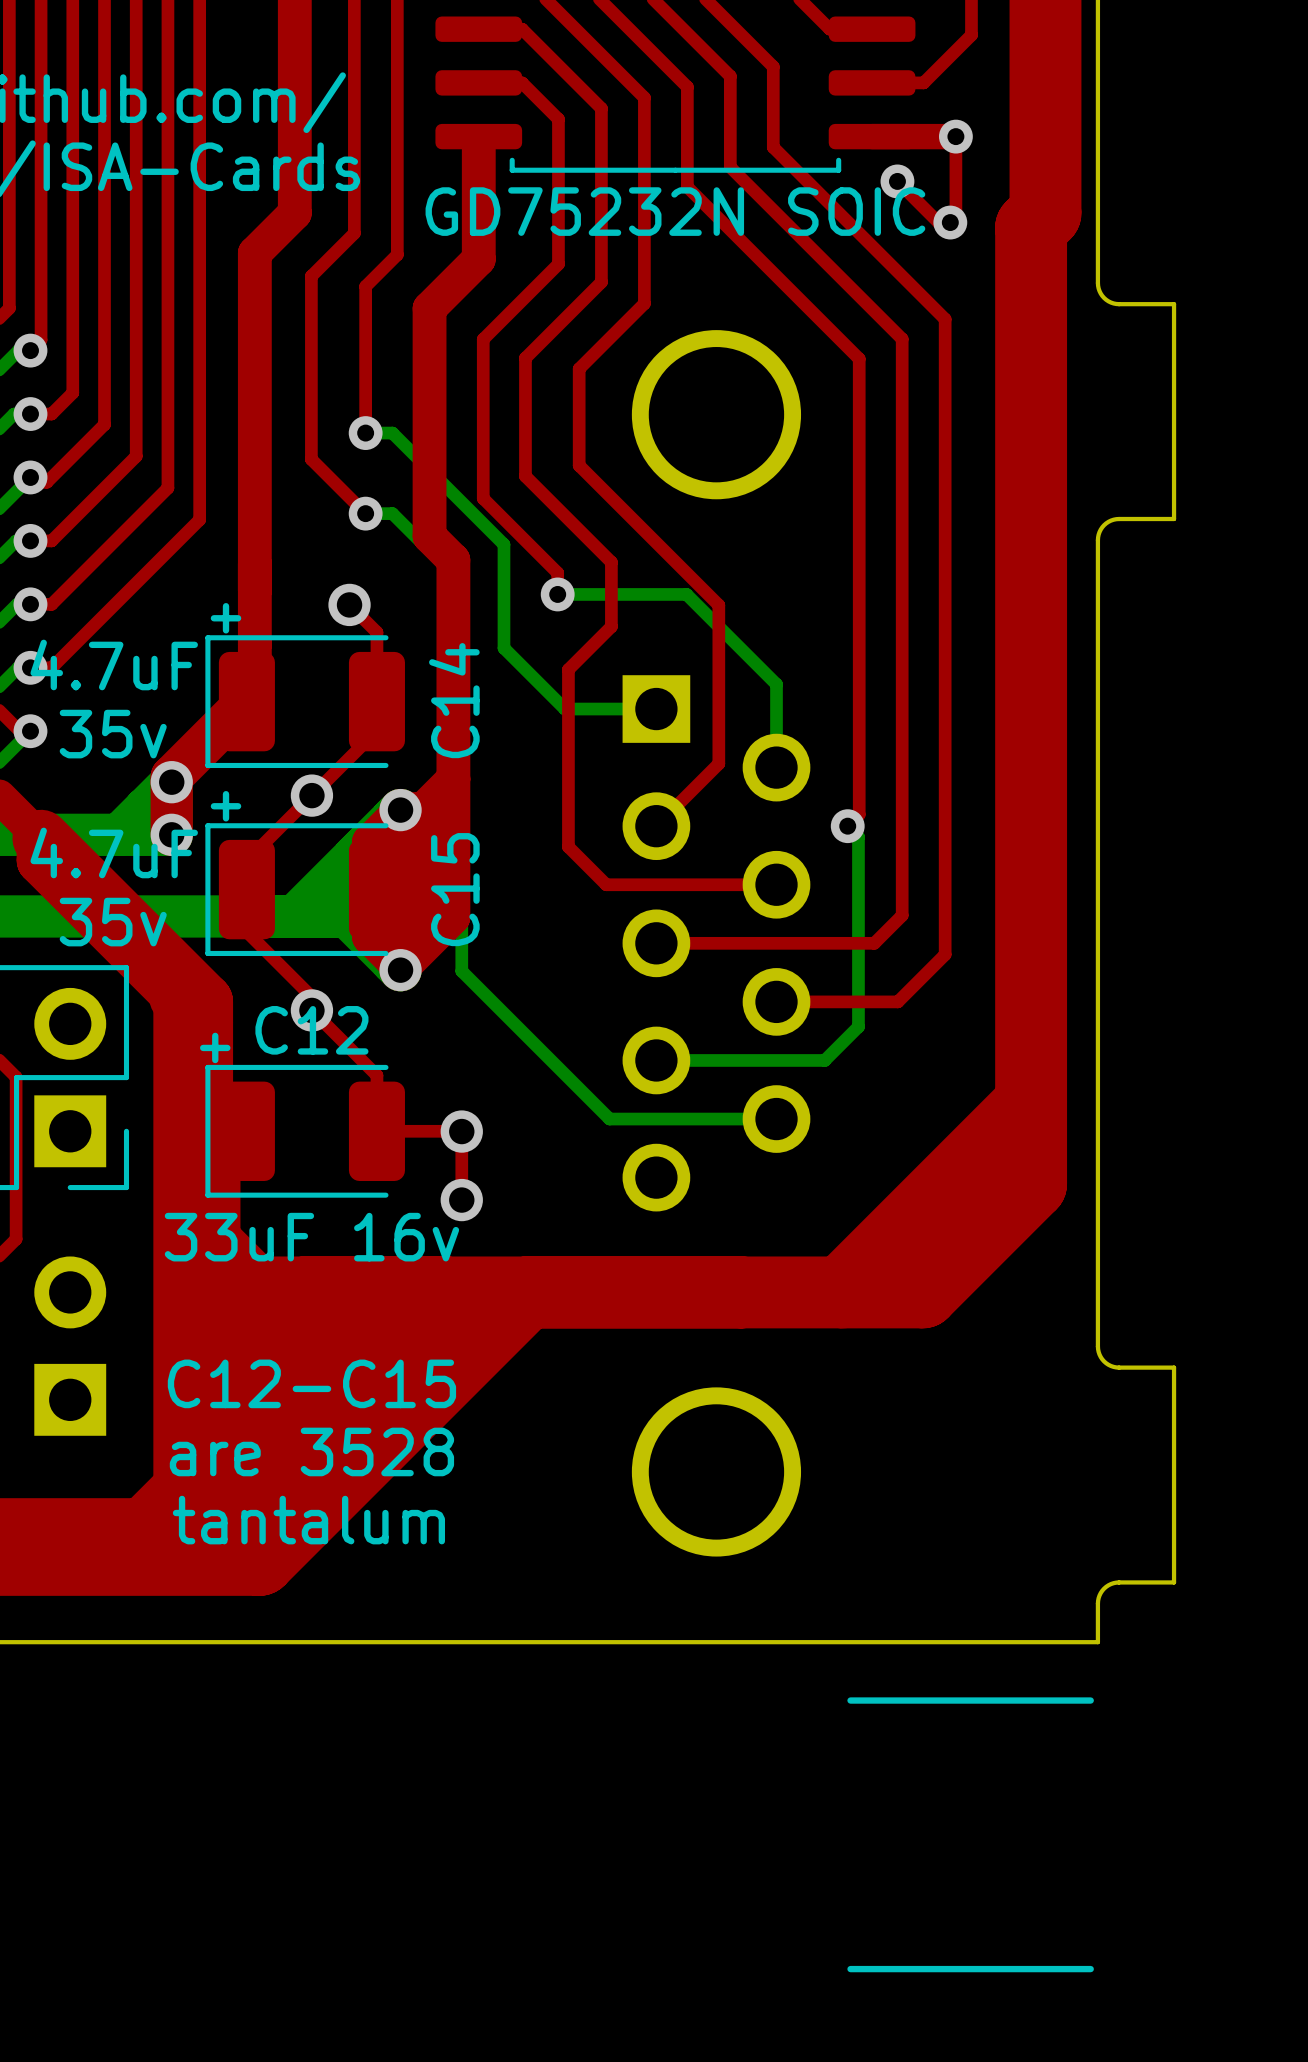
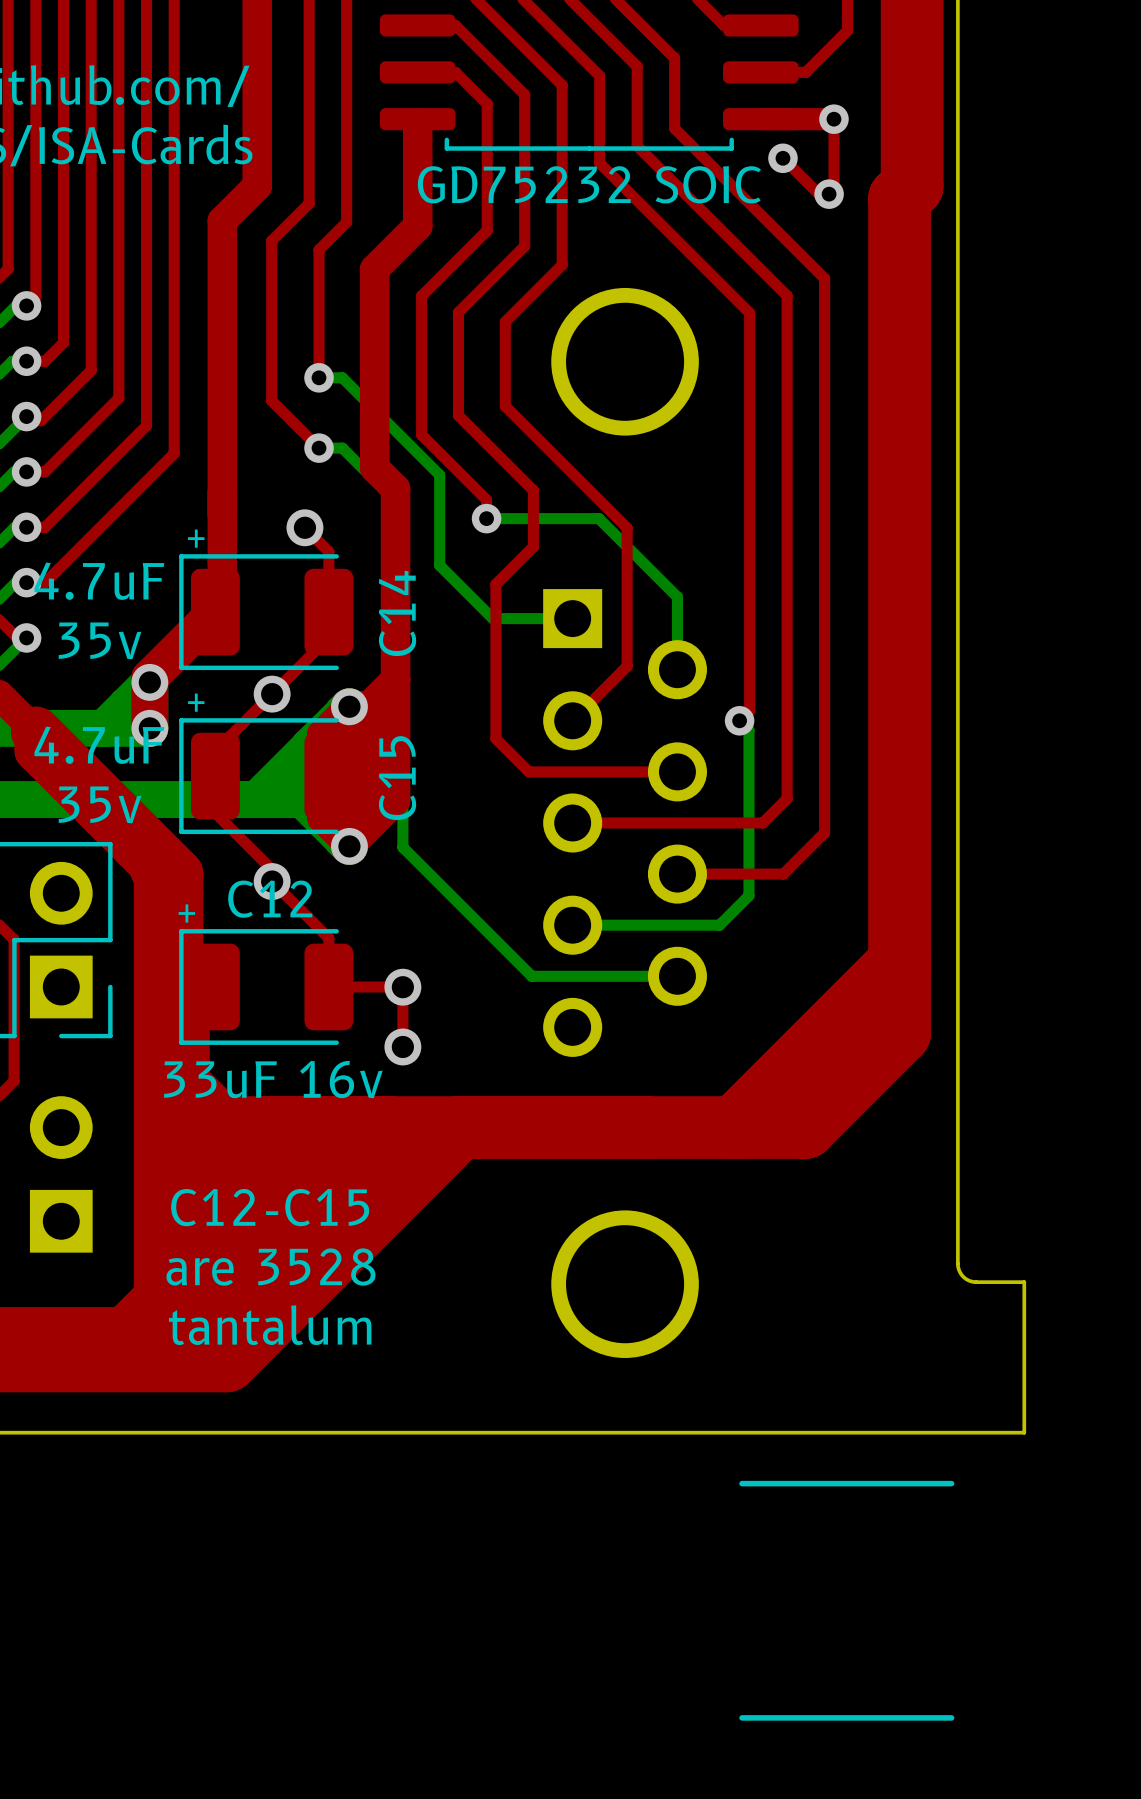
part text: GD75232N SOIC (675, 211) -> GD75232 SOIC (589, 184)
board edge: (1097, 283) (1102, 295) (1113, 303) (1174, 304) (1174, 519) (1113, 519) (1102, 527) (1097, 540) -> (957, 246) (957, 471)
board edge: (1097, 1346) (1102, 1359) (1113, 1366) (1174, 1367) (1174, 1469) -> (957, 1174) (957, 1263) (960, 1272) (965, 1278) (973, 1282) (1024, 1282)
board edge: (1174, 1582) (1119, 1582) (1106, 1586) (1100, 1593) (1098, 1600) (1097, 1642) -> (1024, 1380) (1024, 1432) (957, 1432)

